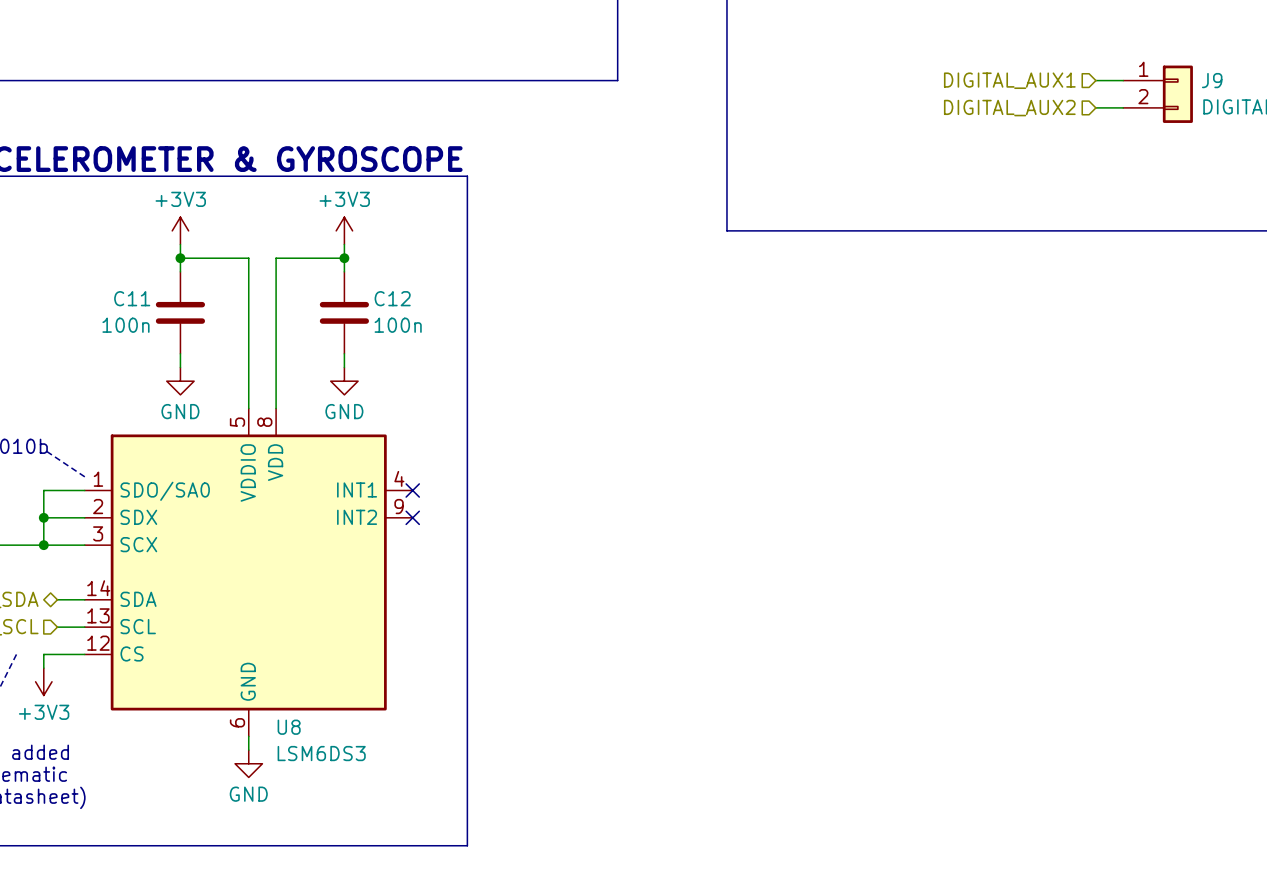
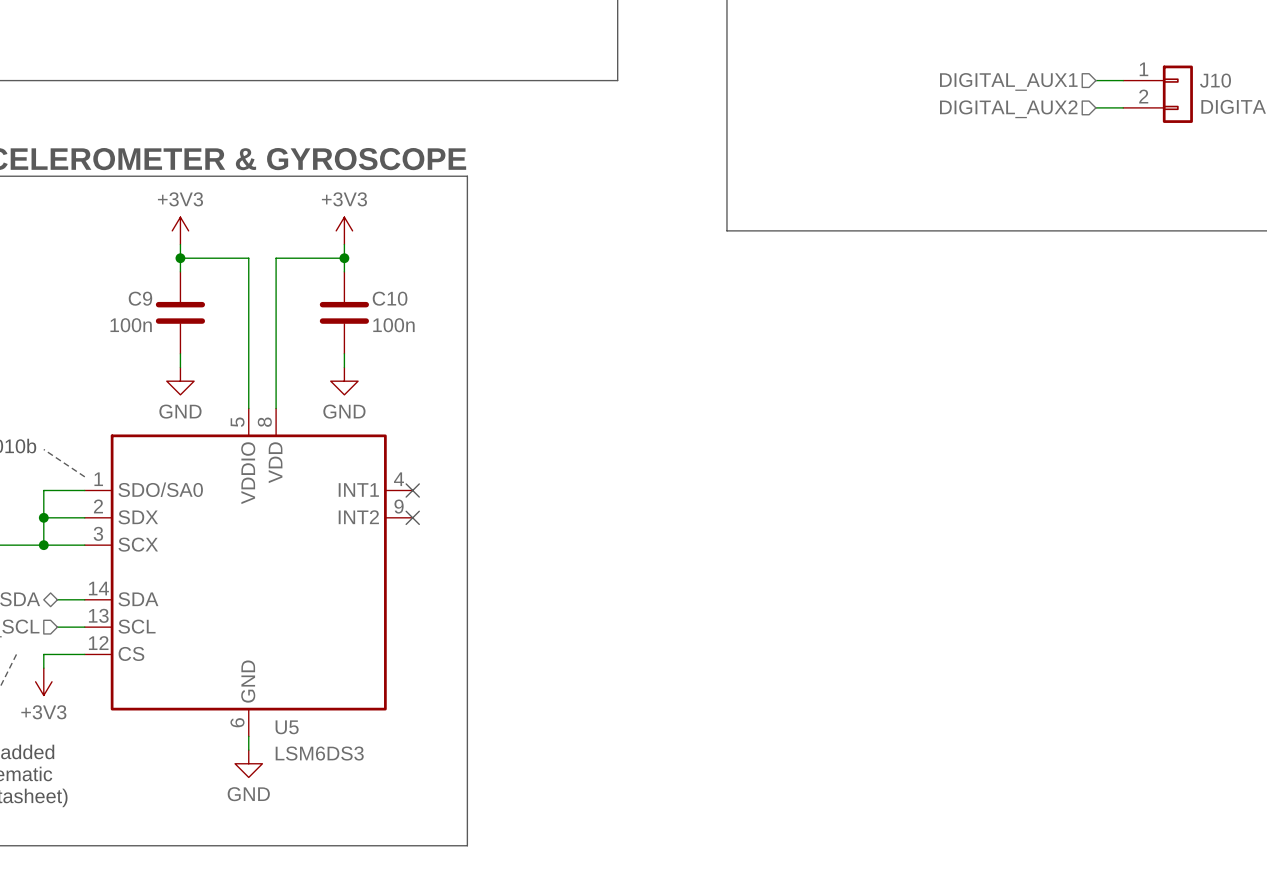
J9 name: J9 (1212, 80) -> J10 (1215, 80)
C11 name: C11 (132, 298) -> C9 (140, 298)
C12 name: C12 (392, 298) -> C10 (390, 298)
U8 name: U8 (289, 727) -> U5 (287, 727)

